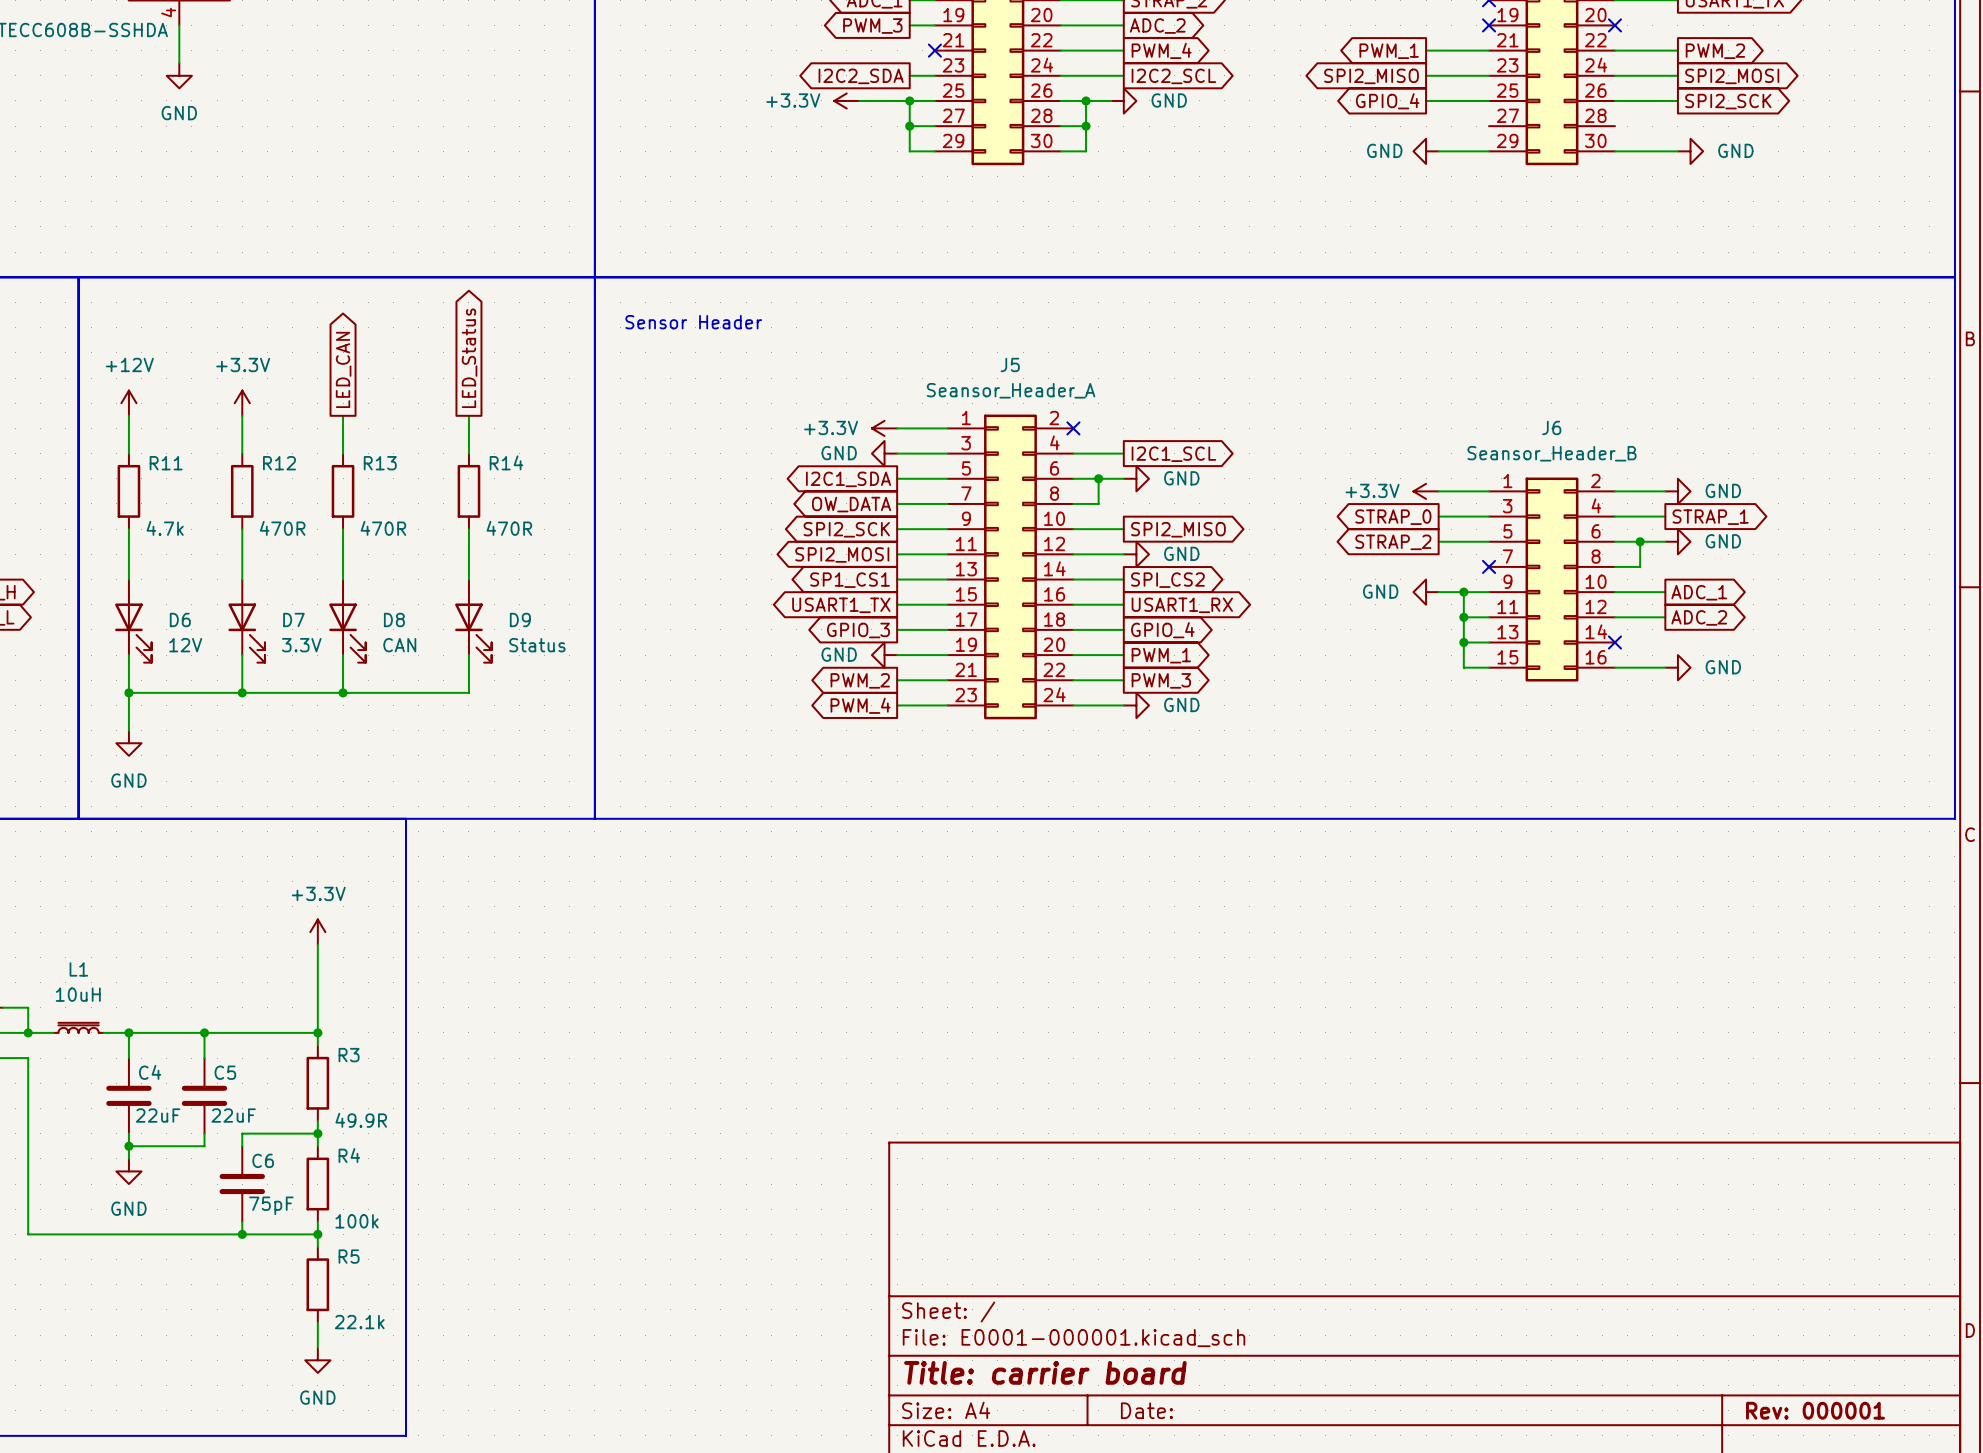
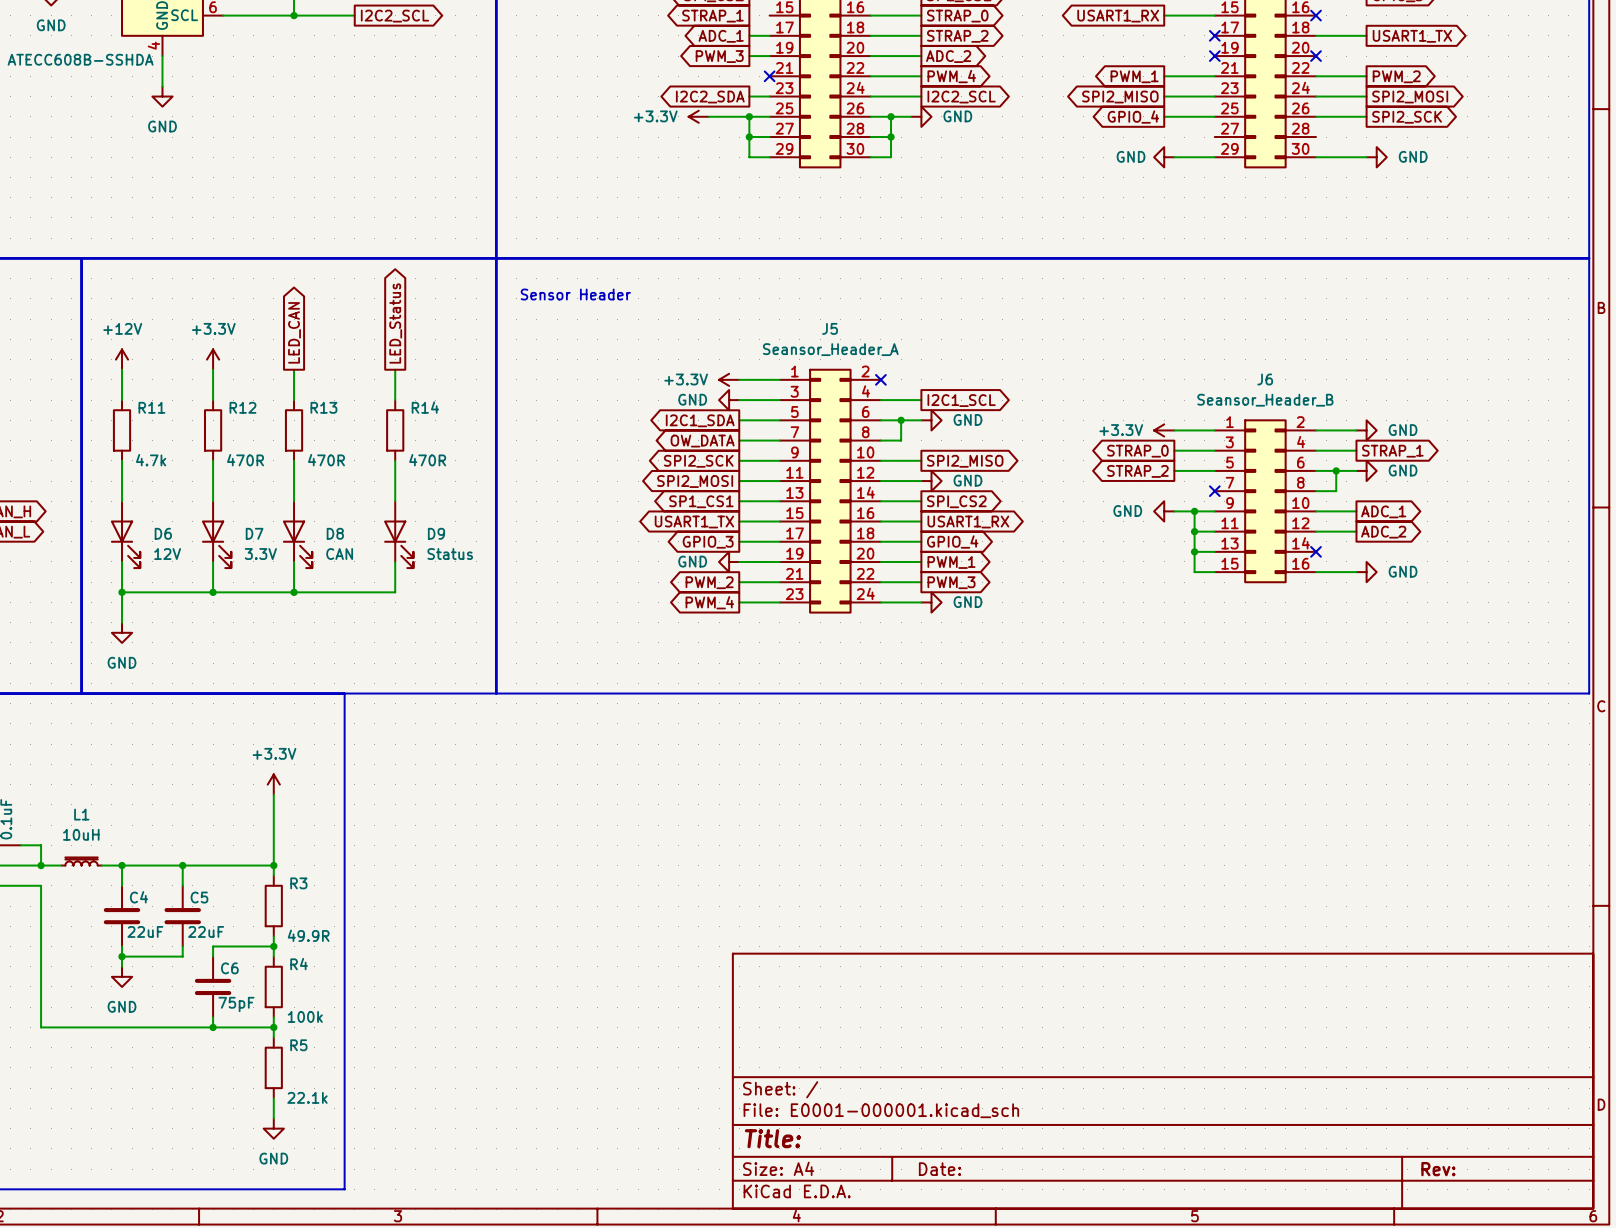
title block: Title: carrier board (1045, 1372) -> Title: (772, 1138)
title block: Rev: 000001 (1815, 1410) -> Rev: (1438, 1169)

